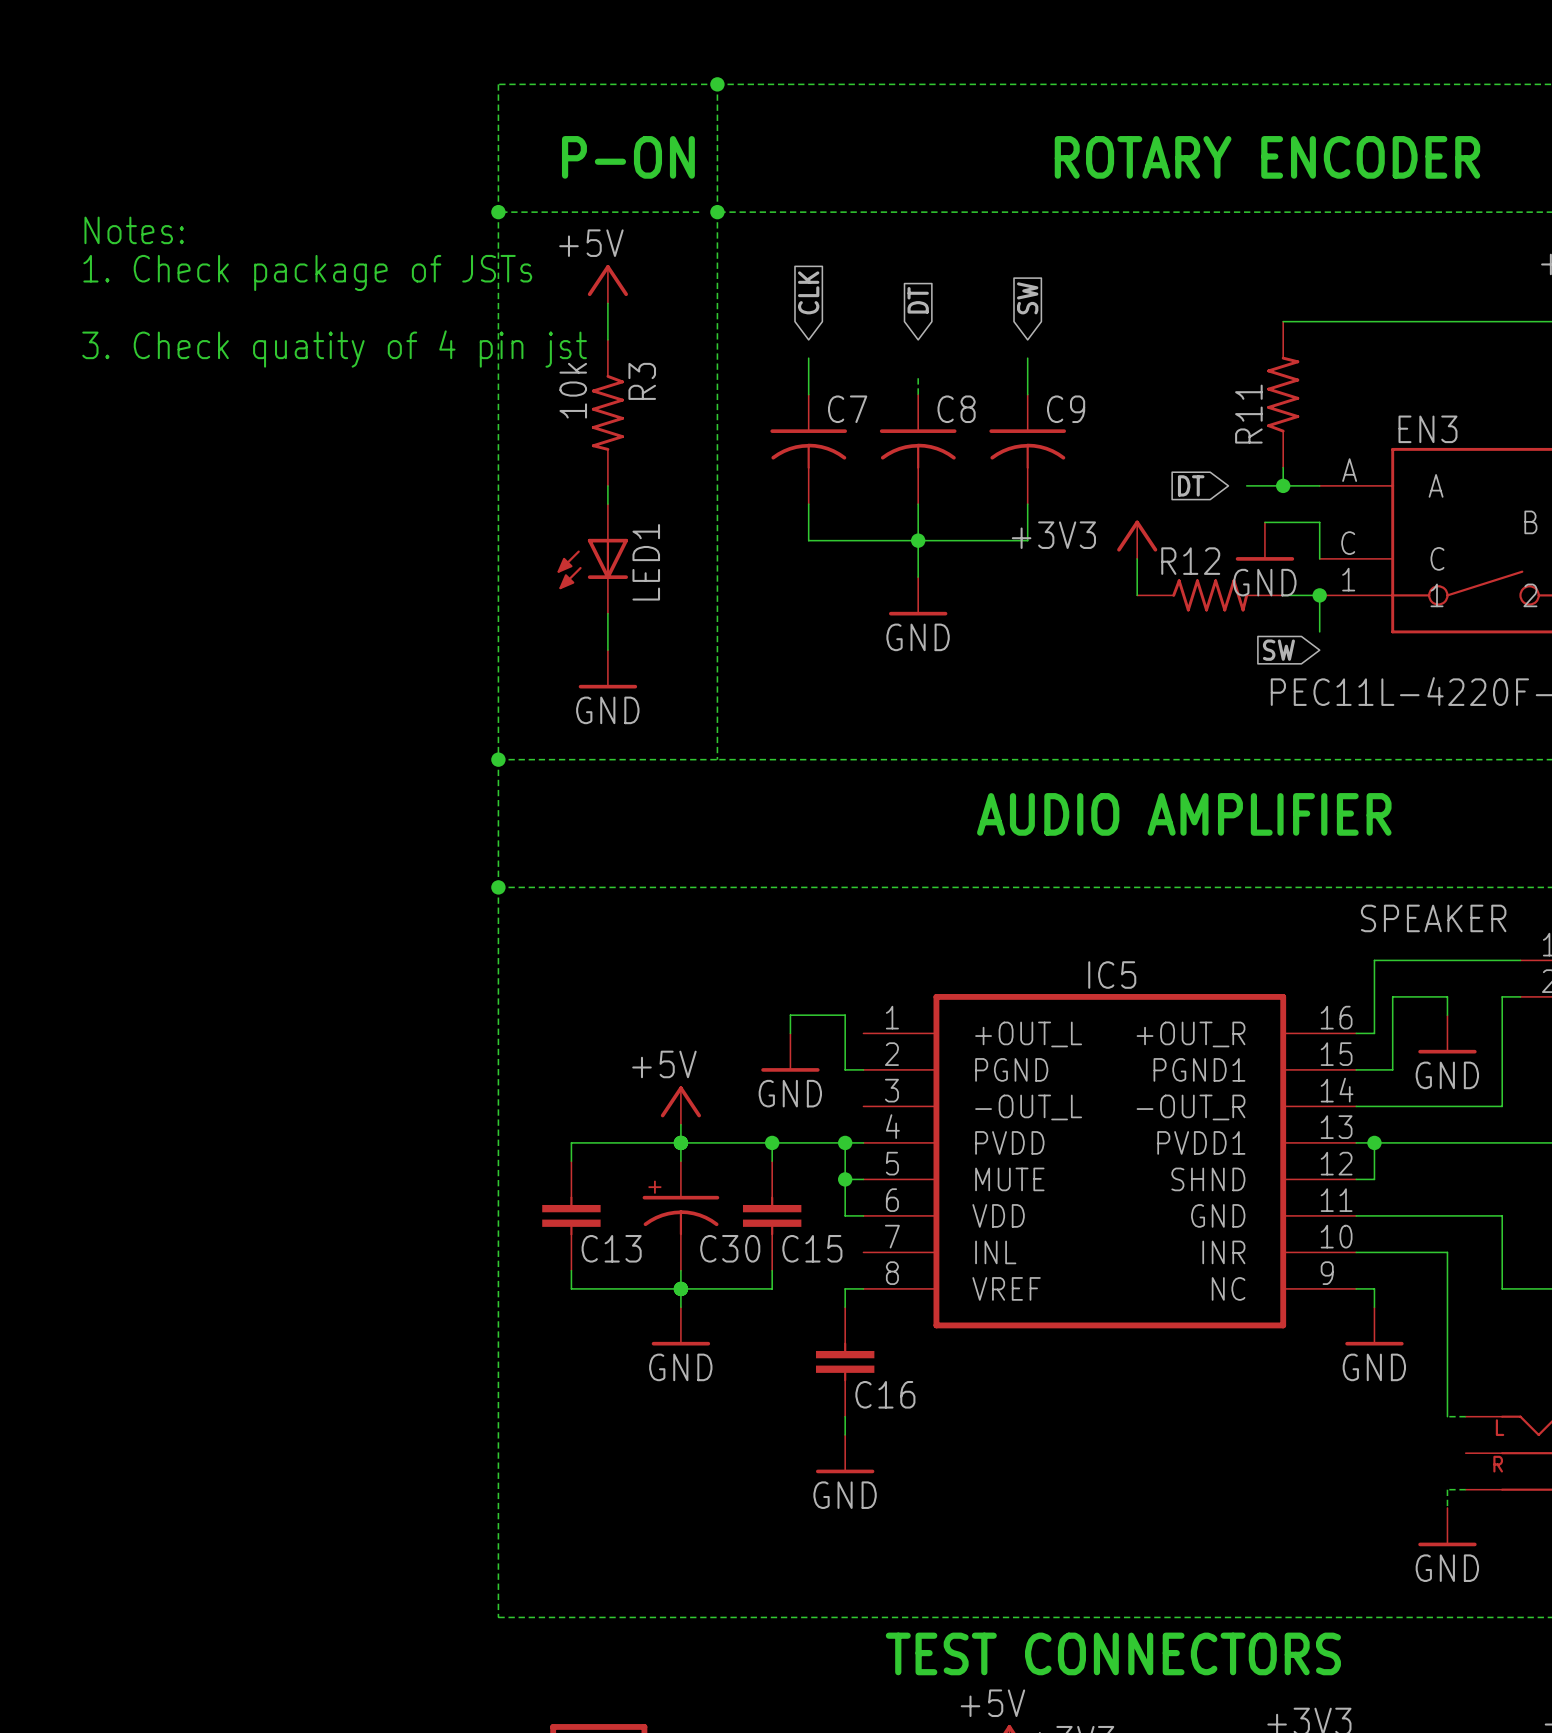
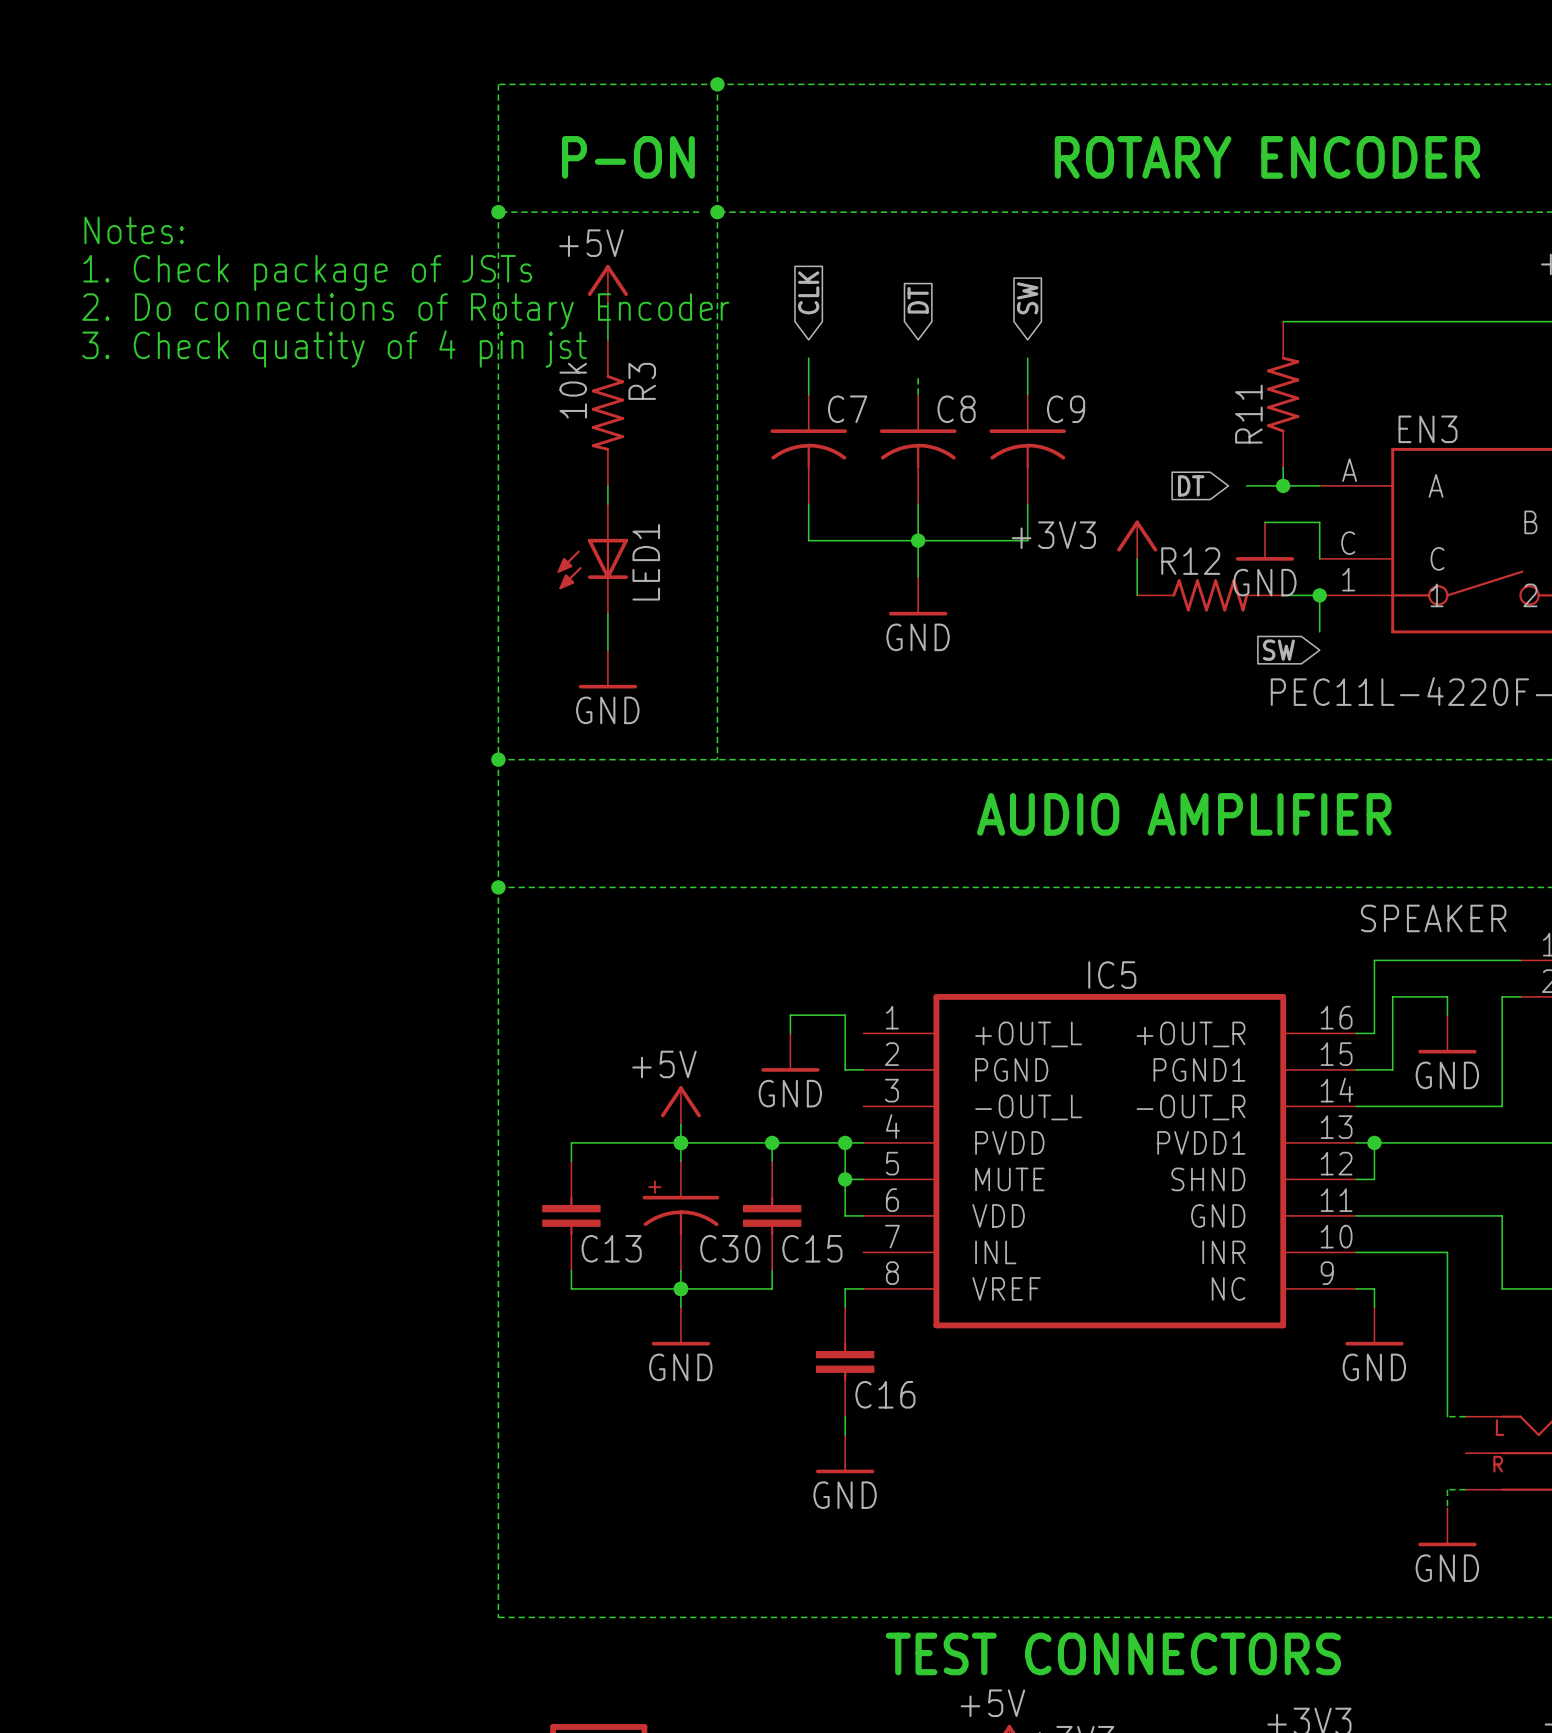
text: none -> 2. Do connections of Rotary Encoder (405, 311)

